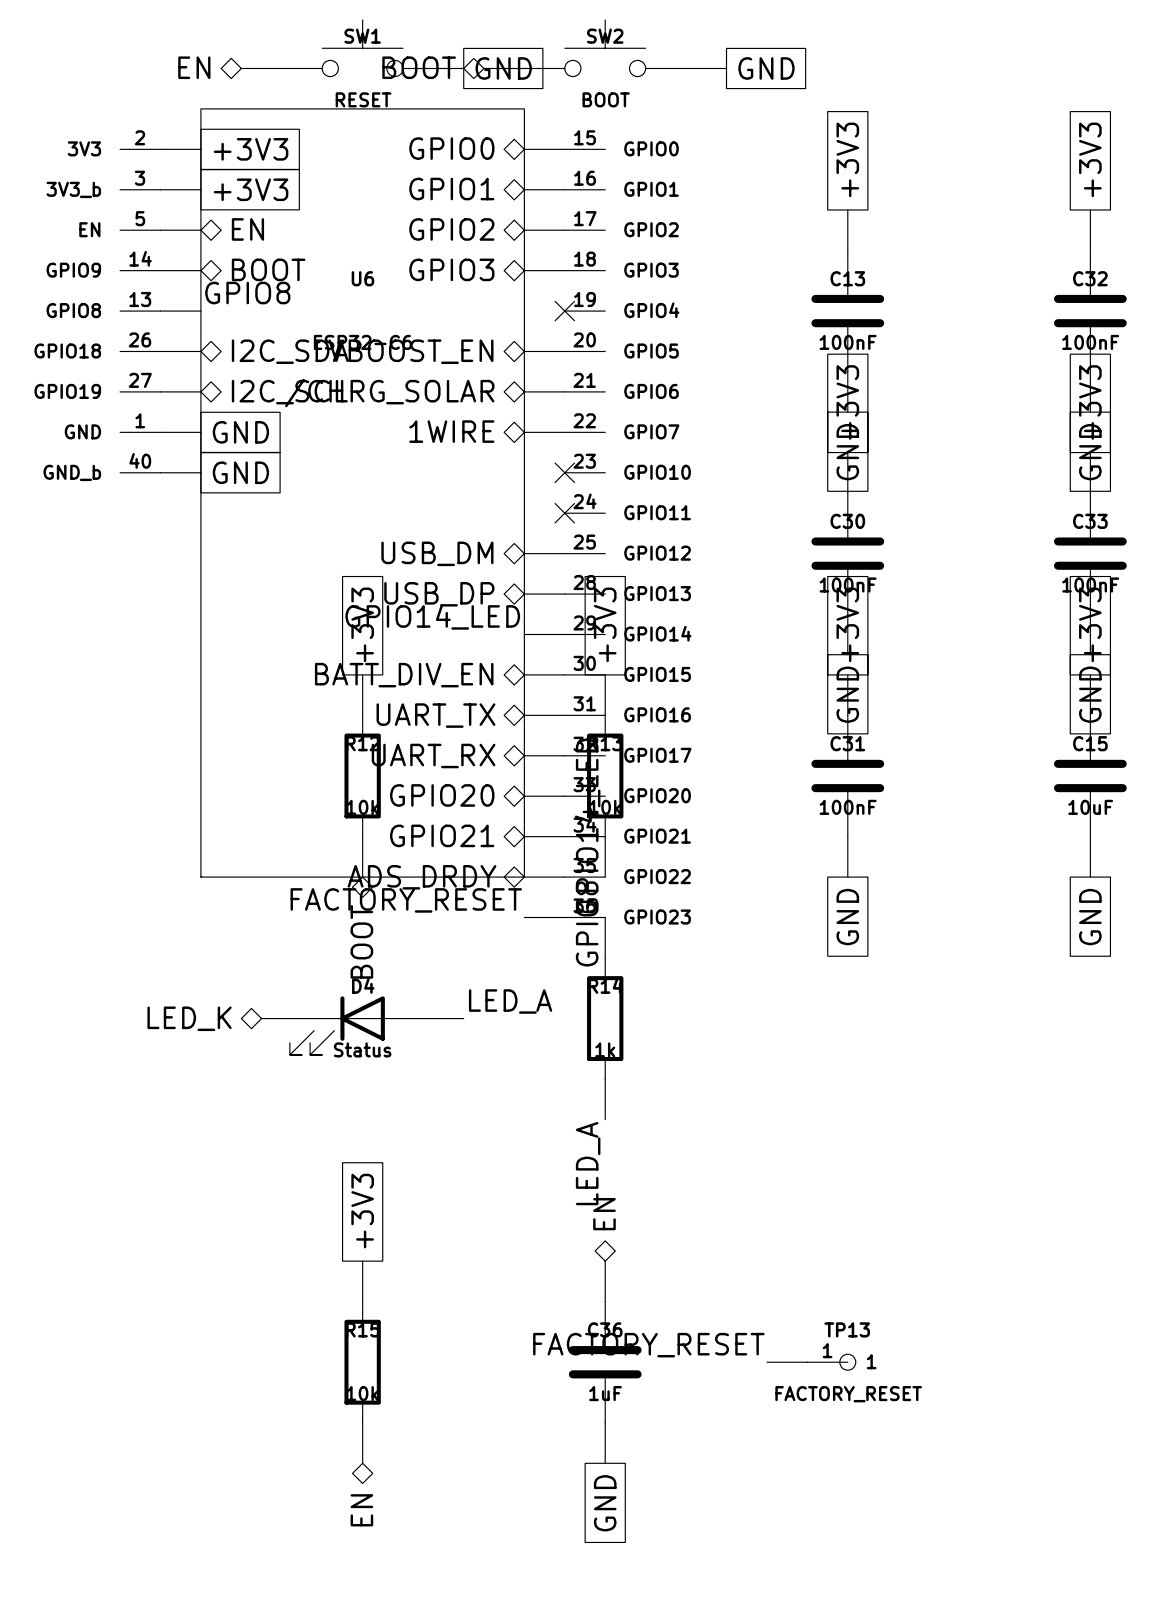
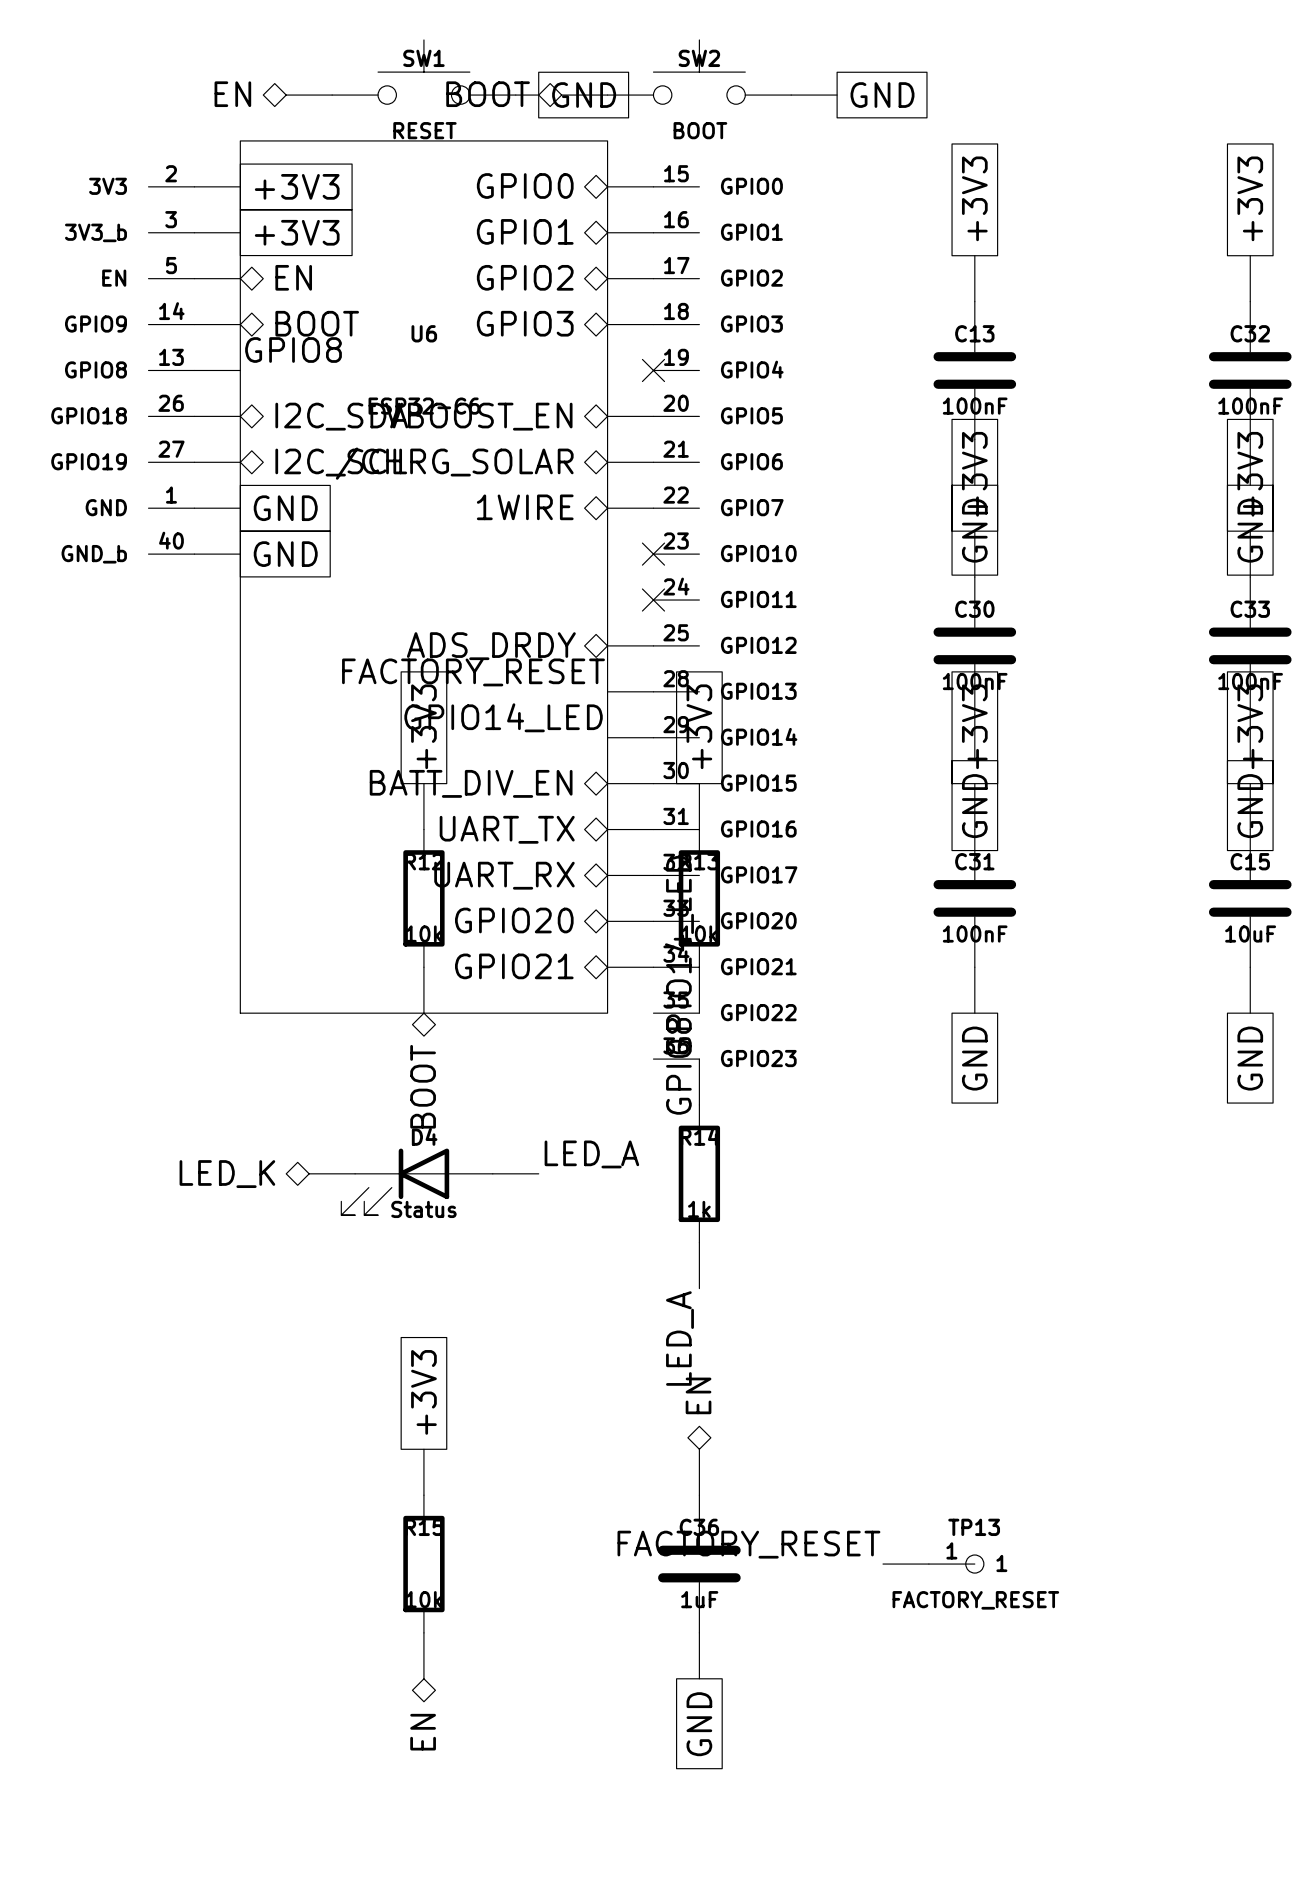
hierarchical label: USB_DM (437, 553) -> ADS_DRDY (491, 646)
hierarchical label: USB_DP (439, 594) -> none
hierarchical label: ADS_DRDY (422, 877) -> none
wire: (524, 877) (564, 877) -> none
label position: FACTORY_RESET (406, 900) -> FACTORY_RESET (473, 672)
wire: (524, 917) (564, 917) -> none

